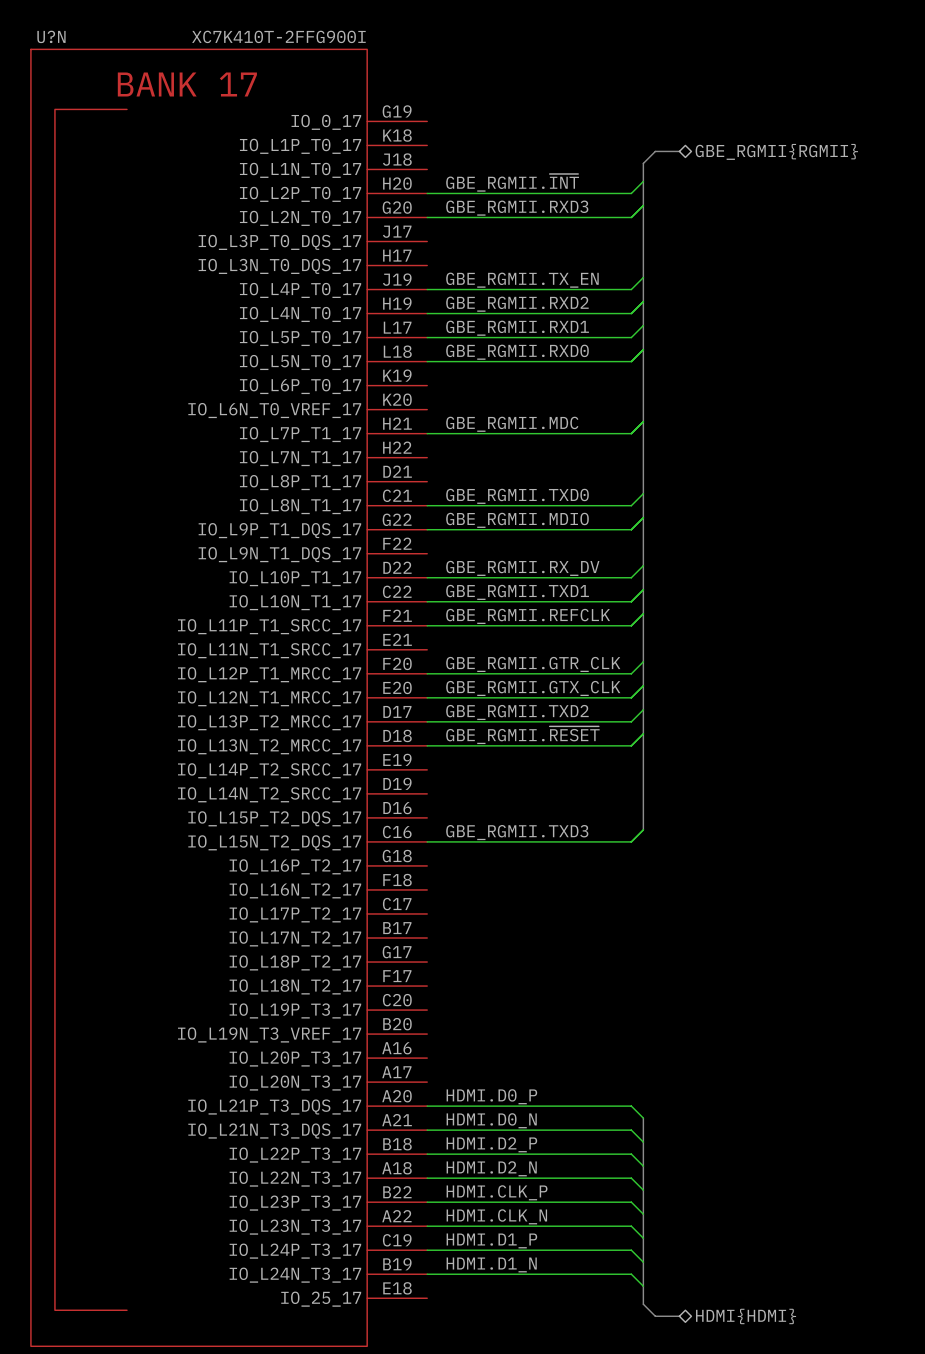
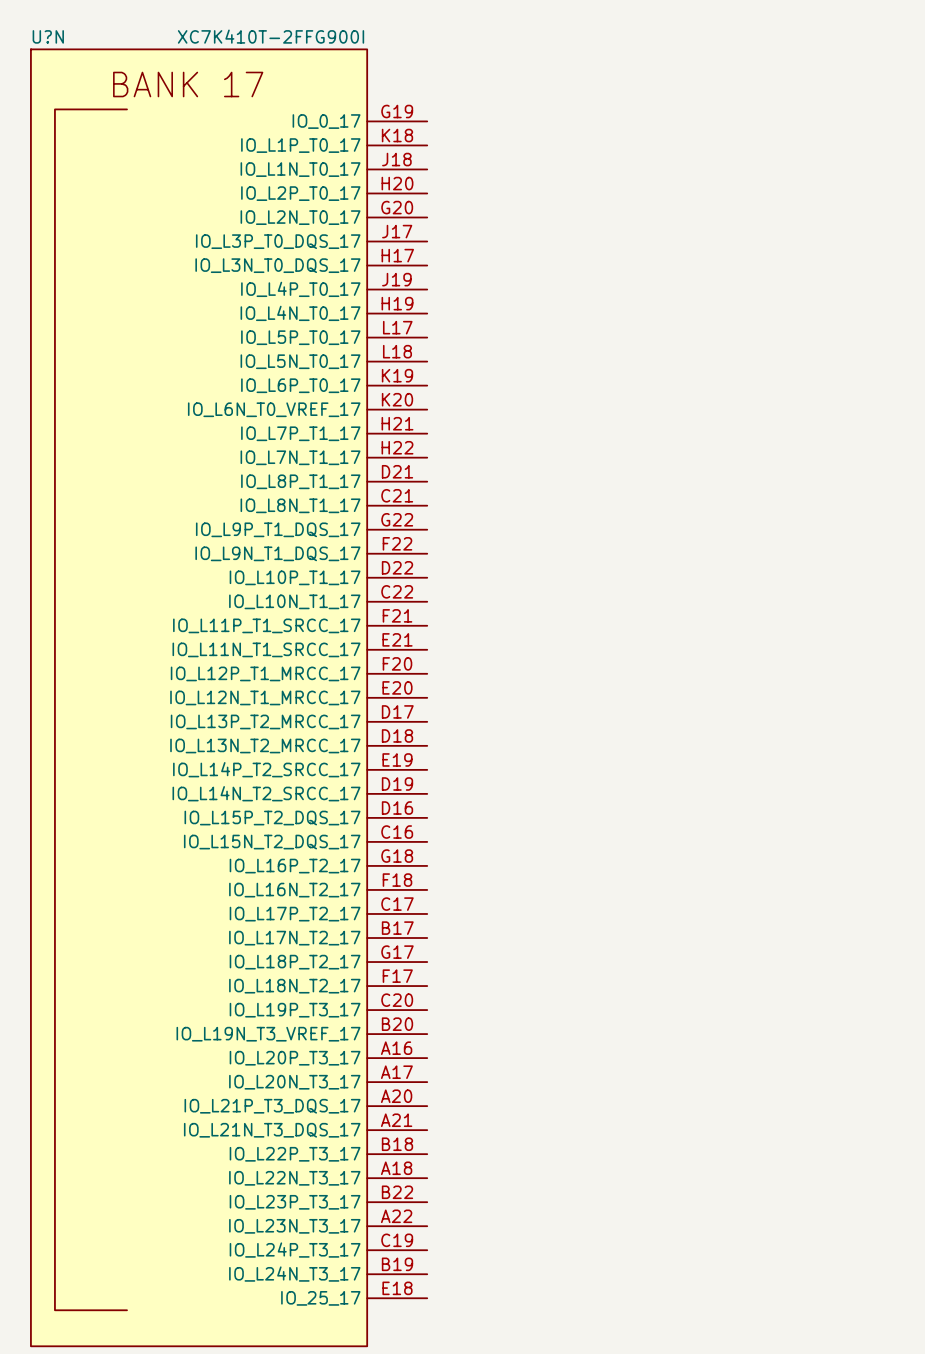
bus: (679, 151) (655, 151) (643, 163) (643, 829) -> none
hierarchical label: GBE_RGMII{RGMII} (776, 151) -> none
wire: (643, 181) (631, 193) (427, 193) -> none
label: GBE_RGMII.~{INT} (512, 182) -> none
wire: (643, 205) (631, 217) (427, 217) -> none
label: GBE_RGMII.RXD3 (517, 208) -> none
wire: (643, 277) (631, 289) (427, 289) -> none
label: GBE_RGMII.TX_EN (522, 280) -> none
wire: (643, 301) (631, 313) (427, 313) -> none
label: GBE_RGMII.RXD2 (517, 304) -> none
wire: (643, 325) (631, 337) (427, 337) -> none
label: GBE_RGMII.RXD1 (517, 328) -> none
wire: (643, 349) (631, 361) (427, 361) -> none
label: GBE_RGMII.RXD0 (517, 352) -> none
wire: (643, 421) (631, 433) (427, 433) -> none
label: GBE_RGMII.MDC (512, 424) -> none
wire: (643, 493) (631, 505) (427, 505) -> none
label: GBE_RGMII.TXD0 (517, 496) -> none
wire: (643, 517) (631, 529) (427, 529) -> none
label: GBE_RGMII.MDIO (517, 520) -> none
wire: (643, 565) (631, 577) (427, 577) -> none
label: GBE_RGMII.RX_DV (522, 568) -> none
wire: (643, 589) (631, 601) (427, 601) -> none
label: GBE_RGMII.TXD1 (517, 592) -> none
wire: (643, 613) (631, 625) (427, 625) -> none
label: GBE_RGMII.REFCLK (528, 616) -> none
wire: (643, 661) (631, 673) (427, 673) -> none
label: GBE_RGMII.GTR_CLK (533, 664) -> none
wire: (643, 685) (631, 697) (427, 697) -> none
label: GBE_RGMII.GTX_CLK (533, 688) -> none
wire: (643, 709) (631, 721) (427, 721) -> none
label: GBE_RGMII.TXD2 (517, 712) -> none
wire: (643, 733) (631, 745) (427, 745) -> none
label: GBE_RGMII.~{RESET} (522, 735) -> none
wire: (643, 829) (631, 841) (427, 841) -> none
label: GBE_RGMII.TXD3 (517, 832) -> none
label: HDMI.D0_P (491, 1096) -> none
wire: (427, 1106) (631, 1106) (643, 1118) -> none
bus: (643, 1118) (643, 1304) (655, 1316) (679, 1316) -> none
label: HDMI.D0_N (491, 1120) -> none
wire: (427, 1130) (631, 1130) (643, 1142) -> none
label: HDMI.D2_P (491, 1144) -> none
wire: (427, 1154) (631, 1154) (643, 1166) -> none
label: HDMI.D2_N (491, 1168) -> none
wire: (427, 1178) (631, 1178) (643, 1190) -> none
label: HDMI.CLK_P (497, 1192) -> none
wire: (427, 1202) (631, 1202) (643, 1214) -> none
label: HDMI.CLK_N (496, 1216) -> none
wire: (427, 1226) (631, 1226) (643, 1238) -> none
label: HDMI.D1_P (491, 1240) -> none
wire: (427, 1250) (631, 1250) (643, 1262) -> none
label: HDMI.D1_N (491, 1264) -> none
wire: (427, 1274) (631, 1274) (643, 1286) -> none
hierarchical label: HDMI{HDMI} (746, 1316) -> none

